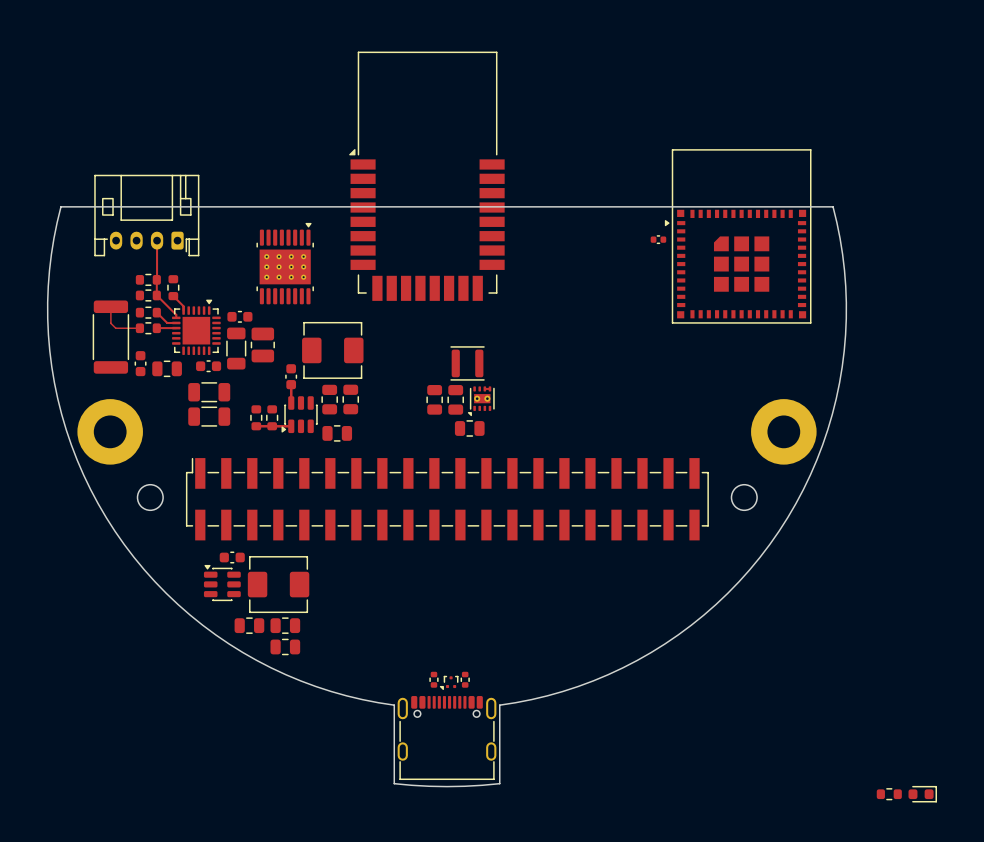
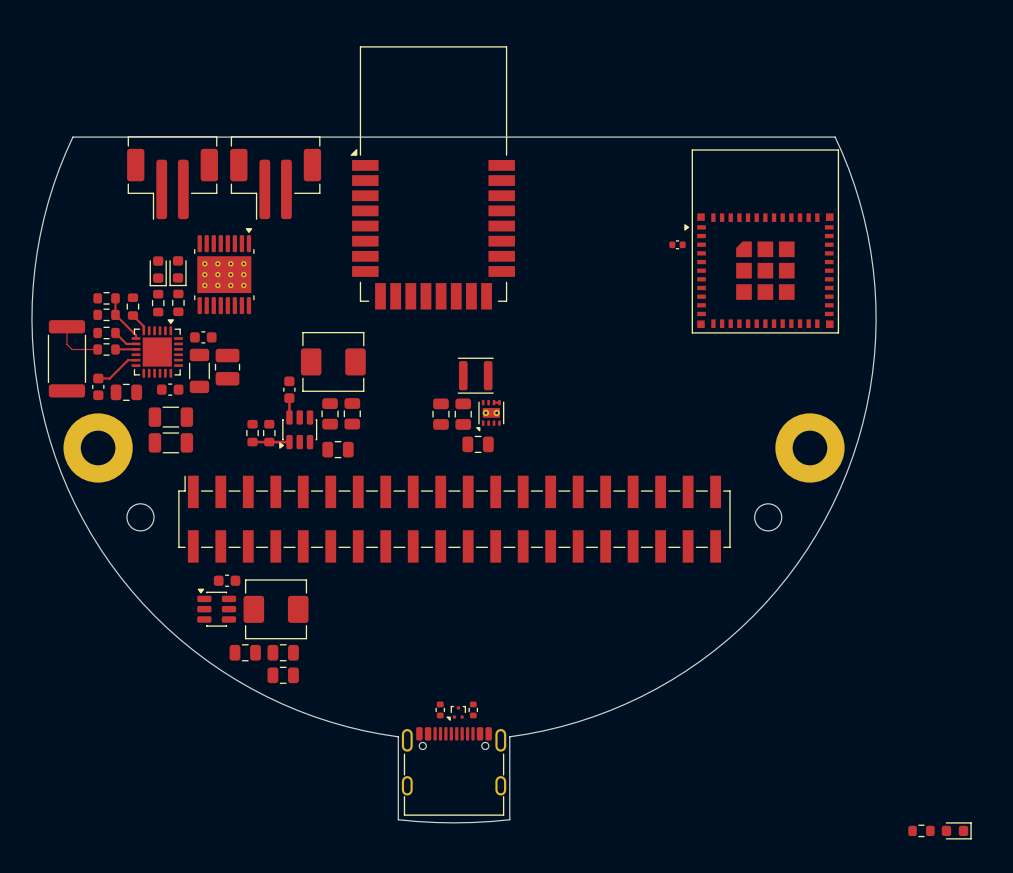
part: none -> (172, 177)
part: none -> (275, 177)
part: (146, 215) -> none
track: (157, 240) (156, 295) -> none
part position: (285, 263) -> (224, 271)
part: none -> (158, 271)
part: none -> (178, 271)
part: (148, 279) -> none
part: (173, 287) -> none
part: none -> (106, 298)
track: none -> (115, 298) (115, 314) (136, 335) (136, 338)
part: none -> (158, 303)
part: none -> (178, 302)
part rotation: 0° (148, 295) -> 90° clockwise (132, 306)
track: (156, 295) (176, 314) (176, 317) -> none
track: (173, 296) (183, 306) (183, 310) -> (132, 315) (143, 326) (143, 330)
part footprint: [92, 300, 130, 374] -> [93, 343, 120, 356]
part: none -> (106, 314)
track: (110, 306) (110, 323) (115, 328) (139, 328) -> (66, 326) (66, 344) (72, 349) (97, 349)
part: (148, 312) -> none
track: (156, 312) (167, 322) (176, 322) -> (115, 332) (126, 343) (136, 343)
part position: (239, 316) -> (203, 337)
part: none -> (106, 332)
part position: (196, 327) -> (157, 348)
part footprint: [226, 327, 247, 370] -> [214, 348, 241, 386]
part: (148, 328) -> none
track: (156, 328) (176, 328) -> (115, 349) (136, 349)
part: (262, 344) -> none
part: none -> (66, 358)
track: none -> (136, 360) (128, 360) (109, 378) (98, 378)
part footprint: [196, 360, 222, 373] -> [188, 348, 210, 394]
part: (140, 363) -> none
part position: (167, 368) -> (126, 392)
part: none -> (98, 386)
part: none -> (170, 389)
part: (209, 392) -> none
part: none -> (170, 417)
part: (209, 416) -> none
part: none -> (170, 442)
board edge: (394, 705) (362, 699) (315, 686) (271, 667) (229, 643) (202, 625) (166, 593) (134, 557) (115, 531) (90, 489) (77, 460) (61, 414) (54, 382) (49, 350) (47, 302) (51, 254) (60, 206) (833, 206) (842, 254) (846, 302) (845, 334) (839, 382) (832, 414) (816, 460) (803, 489) (778, 531) (759, 557) (727, 593) (703, 615) (664, 643) (622, 667) (578, 686) (547, 695) (499, 705) -> (398, 736) (347, 726) (314, 716) (266, 696) (221, 670) (180, 639) (143, 603) (110, 563) (83, 519) (61, 472) (45, 423) (35, 372) (31, 320) (34, 269) (40, 235) (53, 185) (72, 137) (835, 137) (854, 185) (867, 235) (873, 269) (876, 320) (872, 372) (862, 423) (846, 472) (825, 519) (807, 549) (776, 590) (740, 628) (700, 661) (656, 688) (609, 710) (560, 726) (509, 736)

